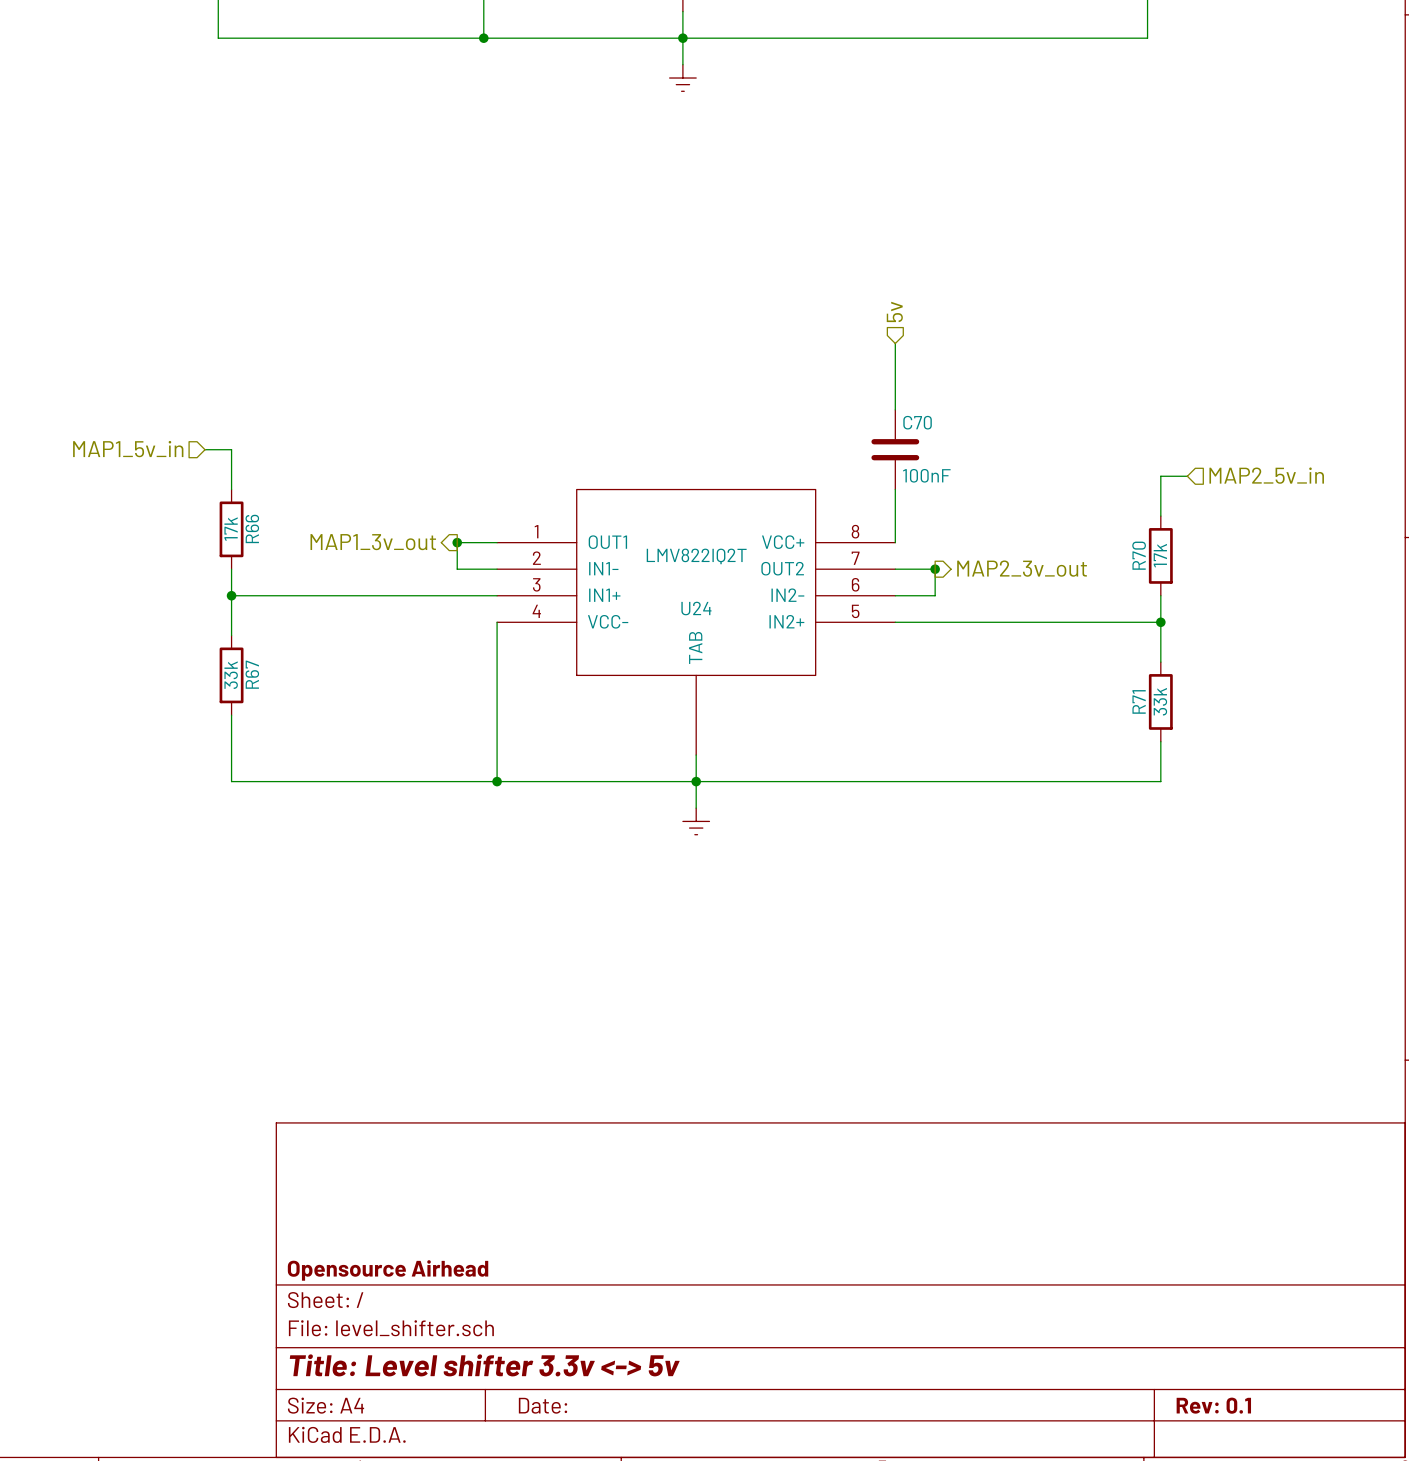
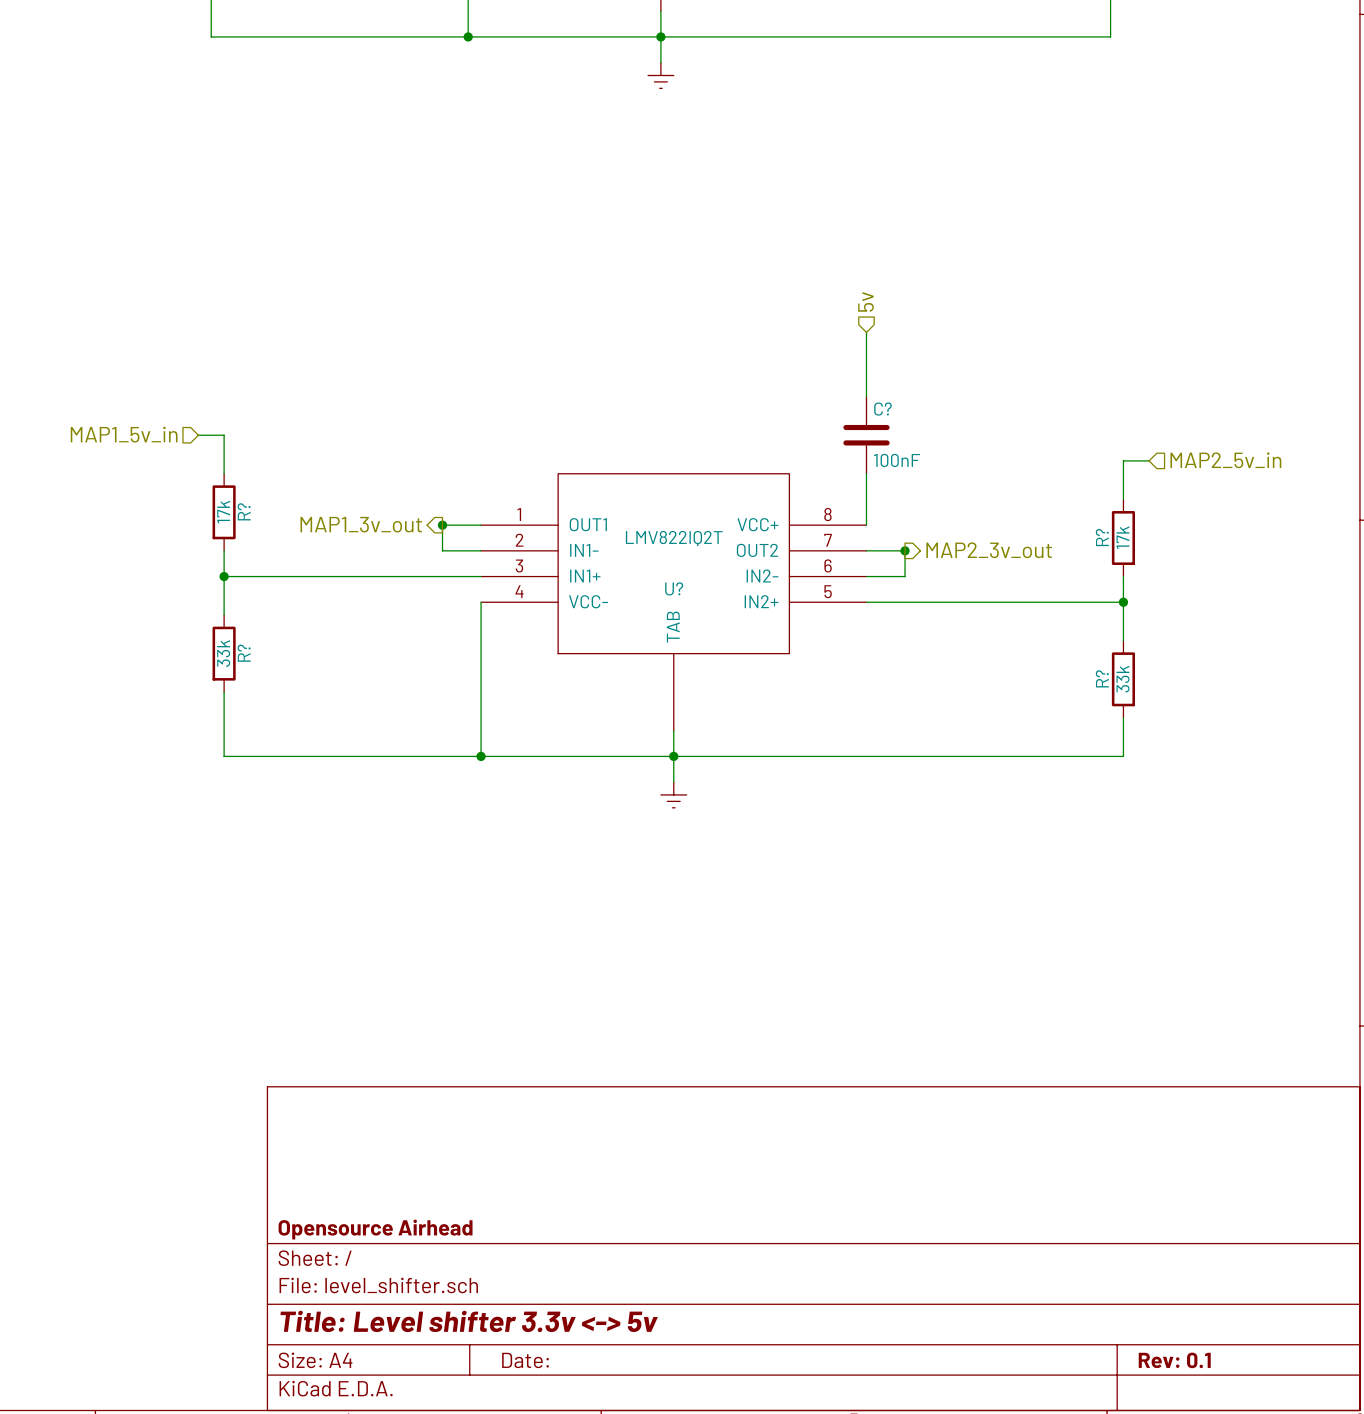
C70 name: C70 (917, 422) -> C? (882, 409)
R66 name: R66 (252, 528) -> R? (244, 511)
R70 name: R70 (1139, 555) -> R? (1102, 537)
U24 name: U24 (696, 608) -> U? (674, 588)
R67 name: R67 (252, 674) -> R? (244, 653)
R71 name: R71 (1139, 701) -> R? (1102, 678)

